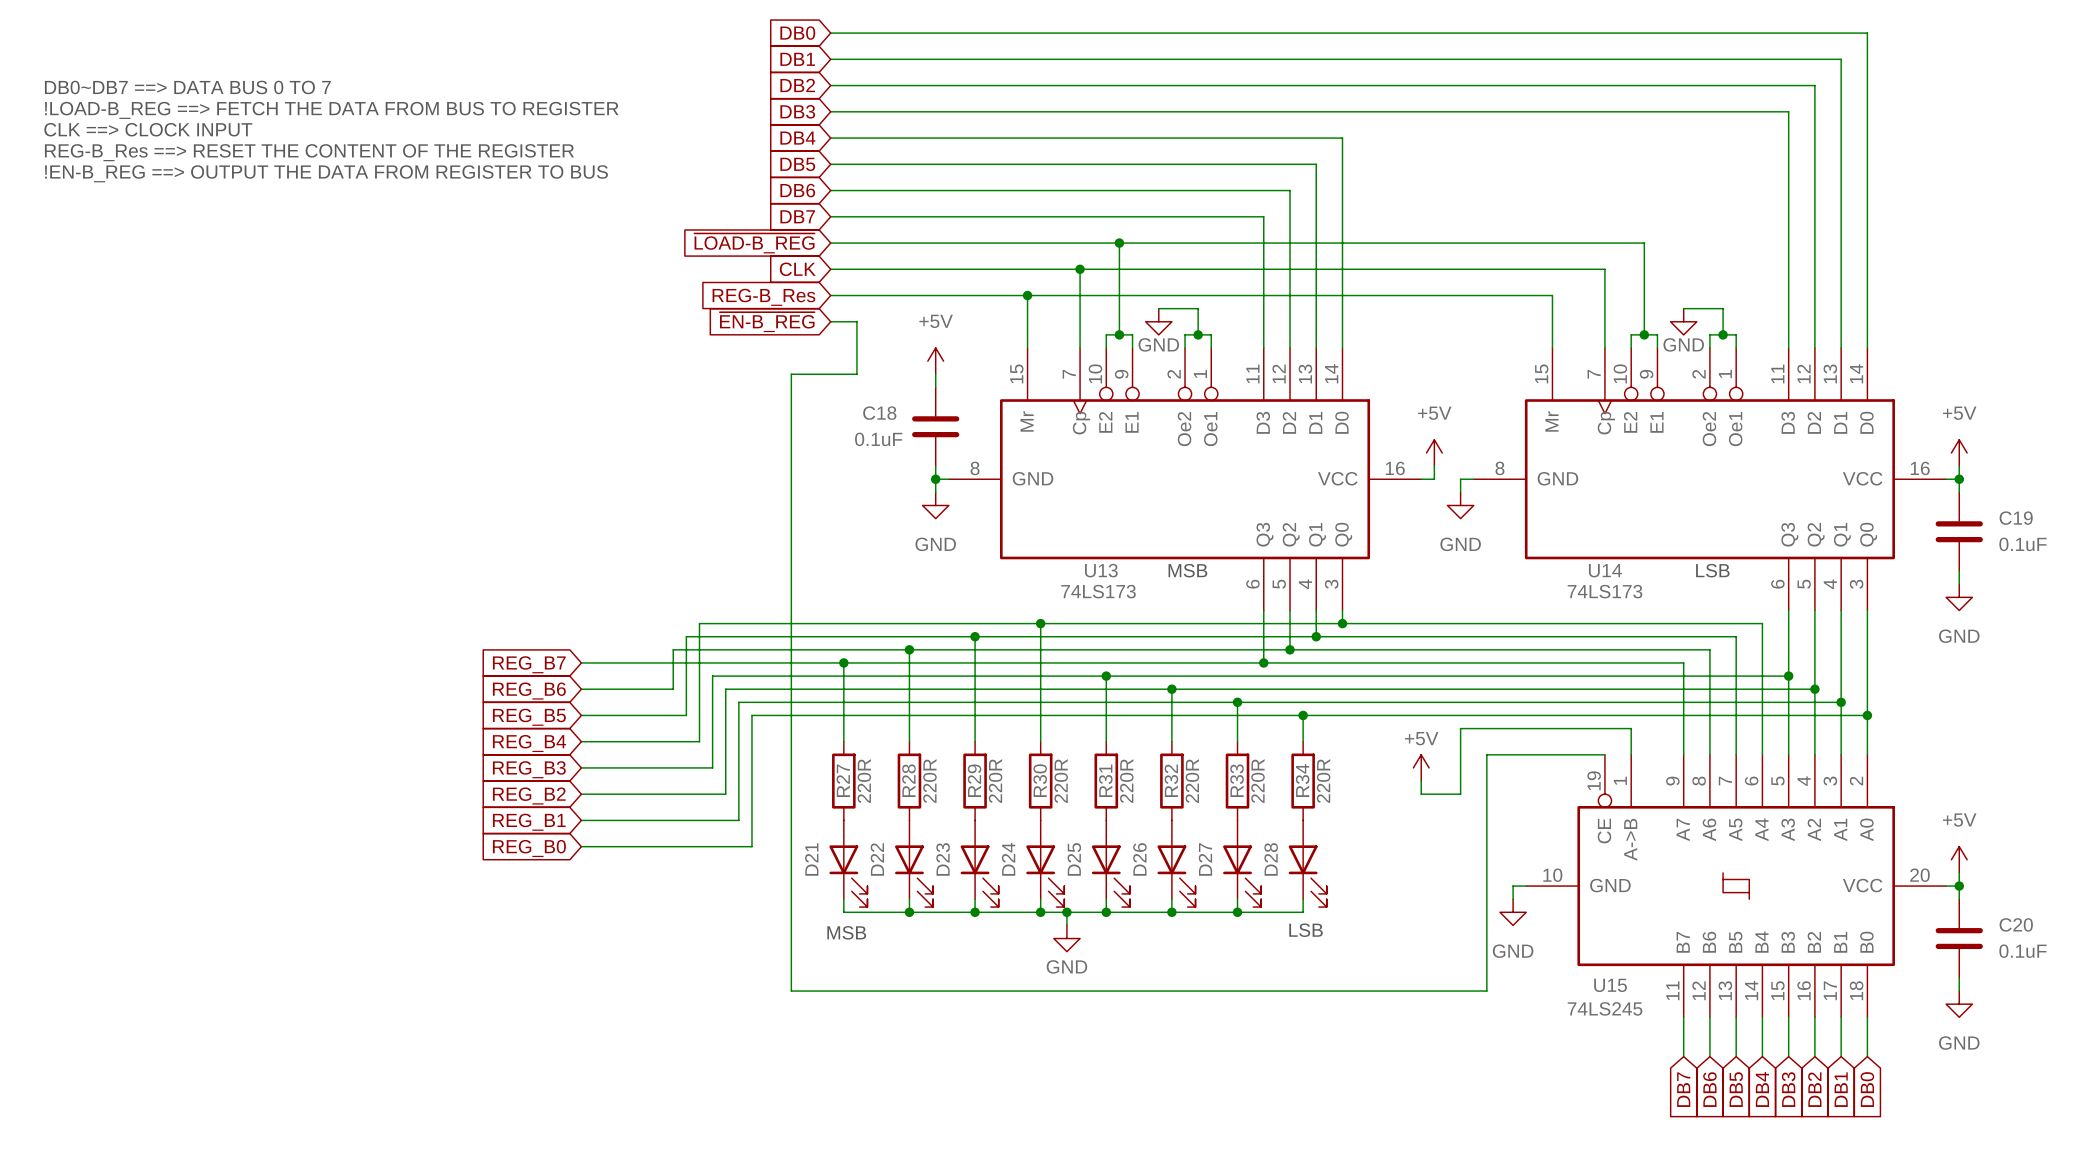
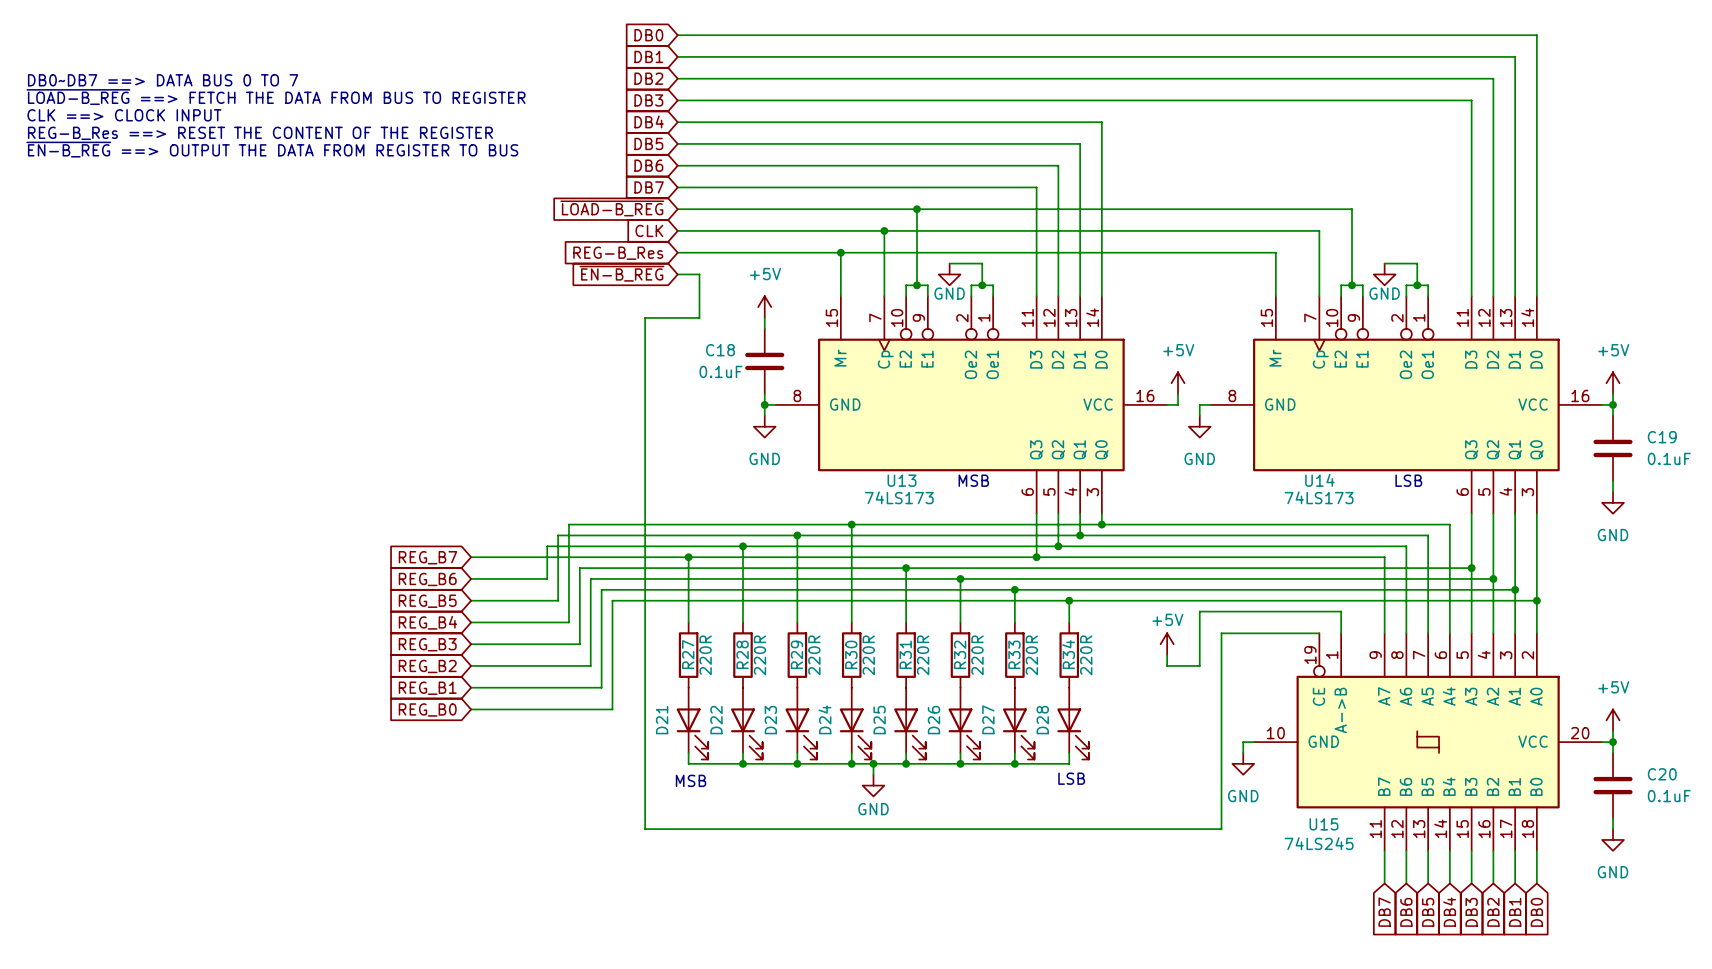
text: !LOAD-B_REG ==> FETCH THE DATA FROM BUS TO REGISTER (331, 110) -> ~{LOAD-B_REG} ==> FETCH THE DATA FROM BUS TO REGISTER (275, 97)
text: !EN-B_REG ==> OUTPUT THE DATA FROM REGISTER TO BUS (326, 173) -> ~{EN-B_REG} ==> OUTPUT THE DATA FROM REGISTER TO BUS (272, 149)

